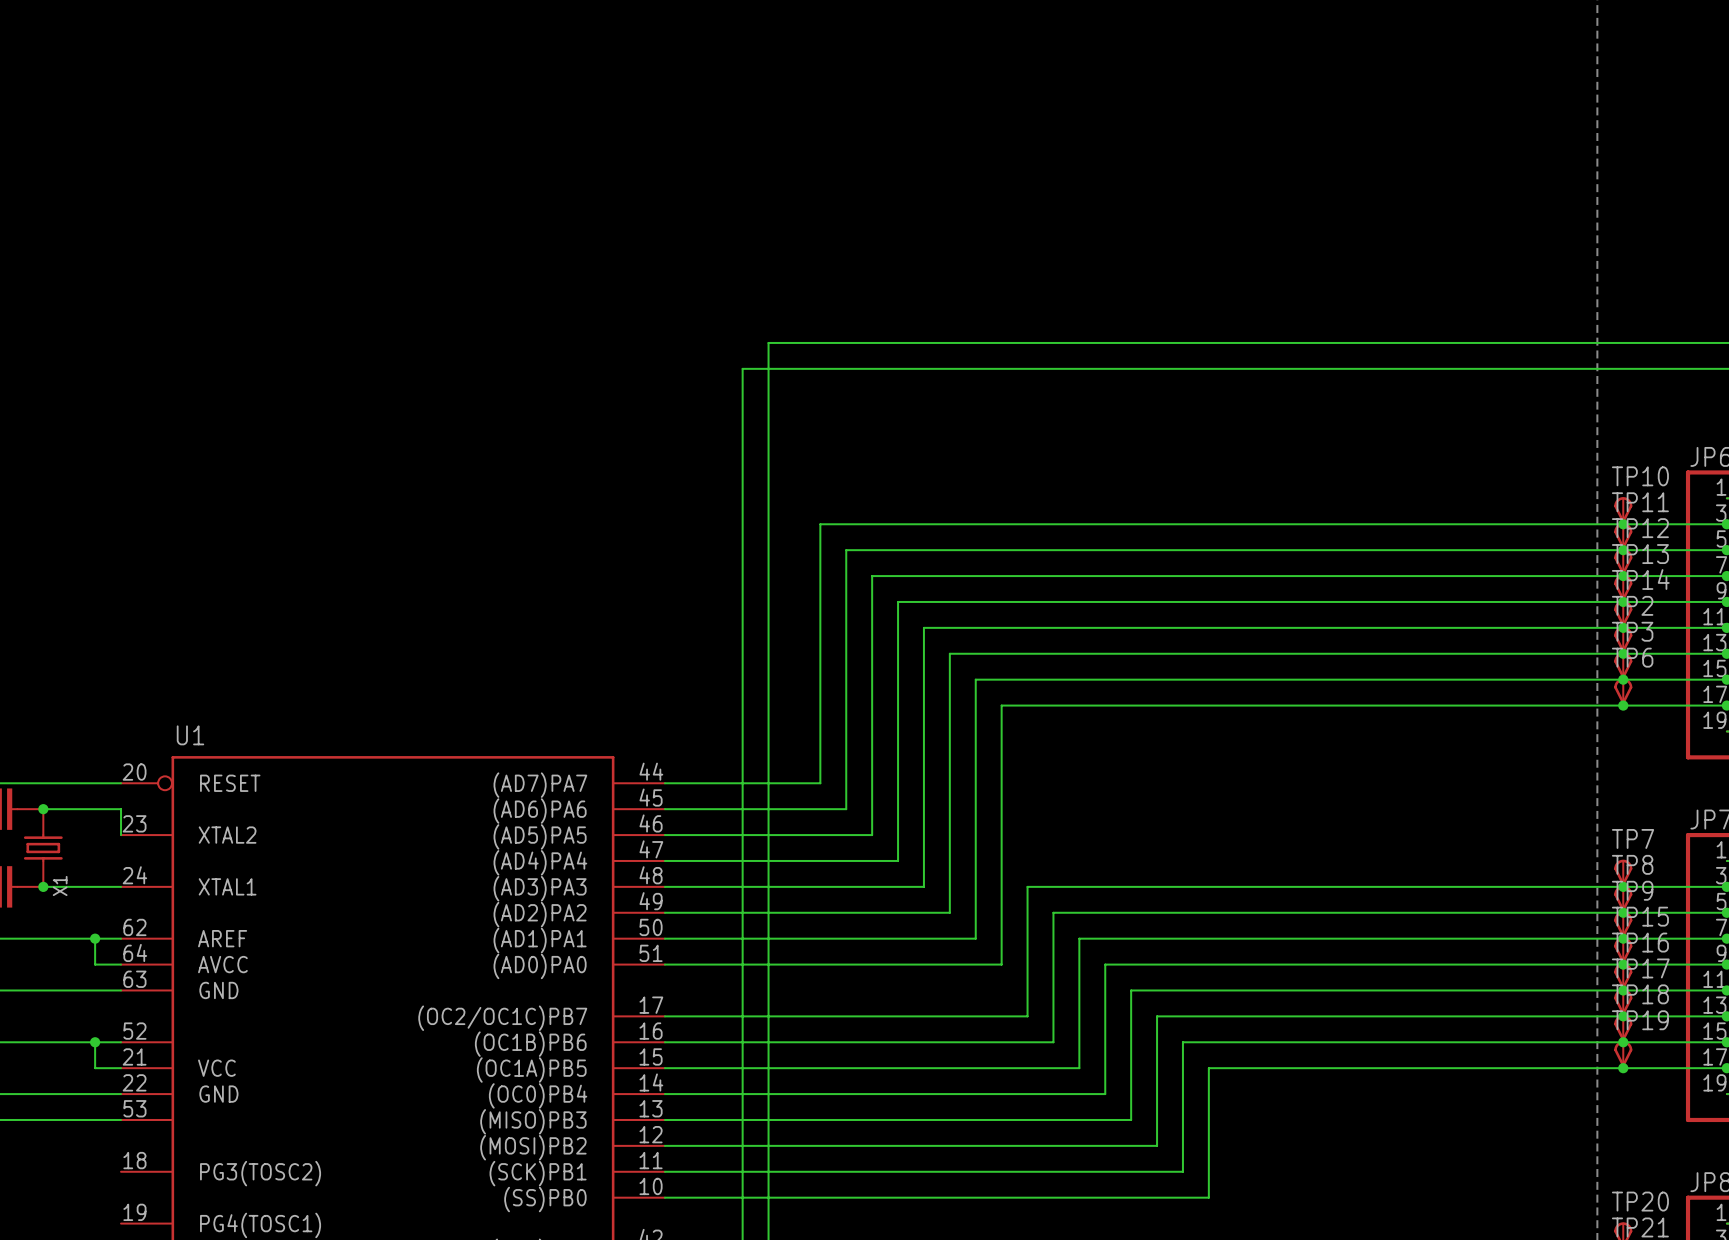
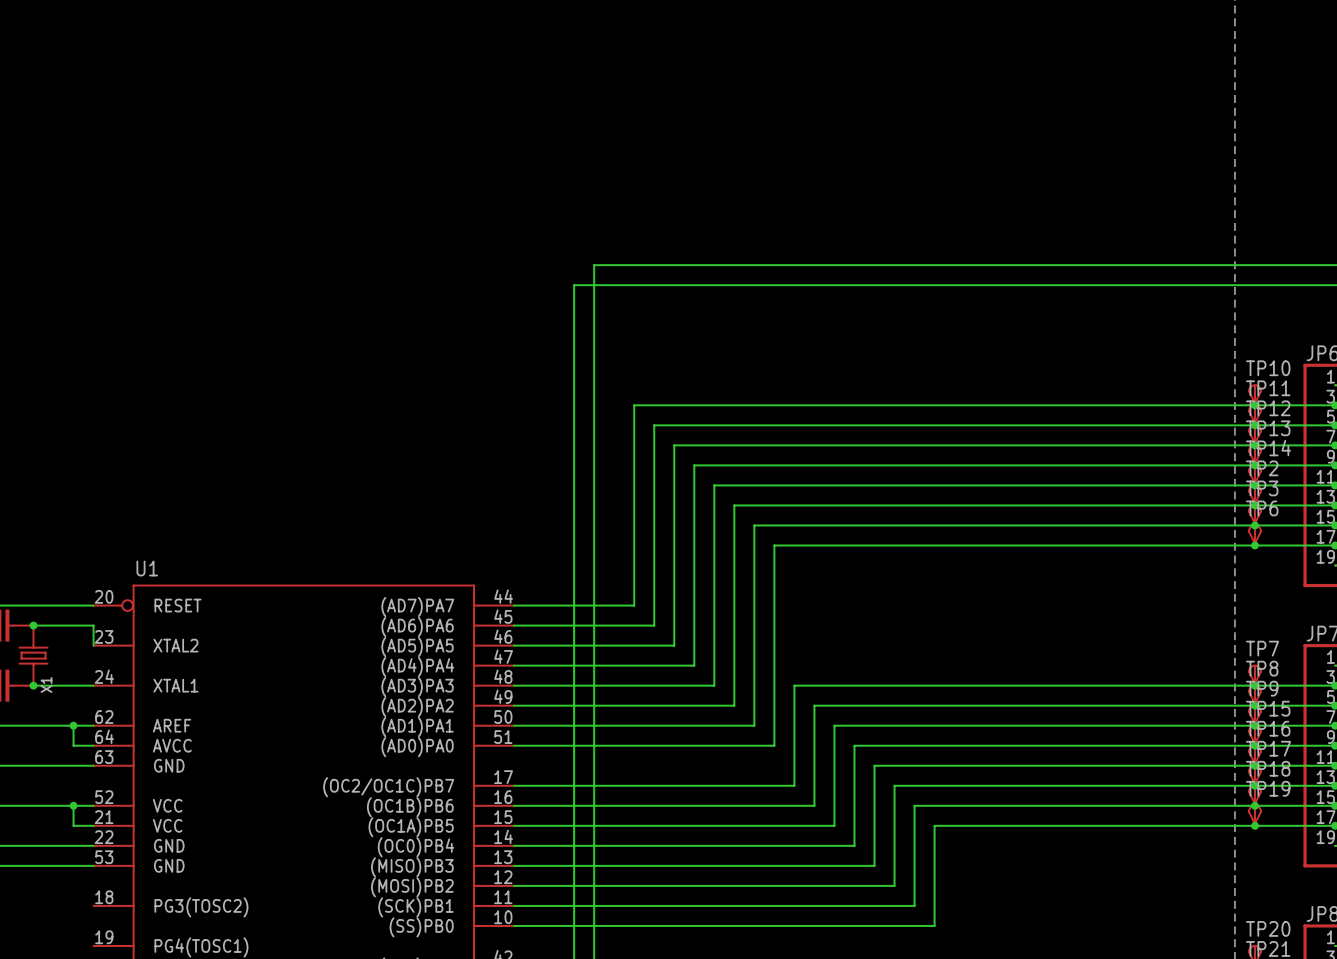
U1 pin name: none -> VCC (167, 805)
U1 pin name: none -> GND (169, 865)

